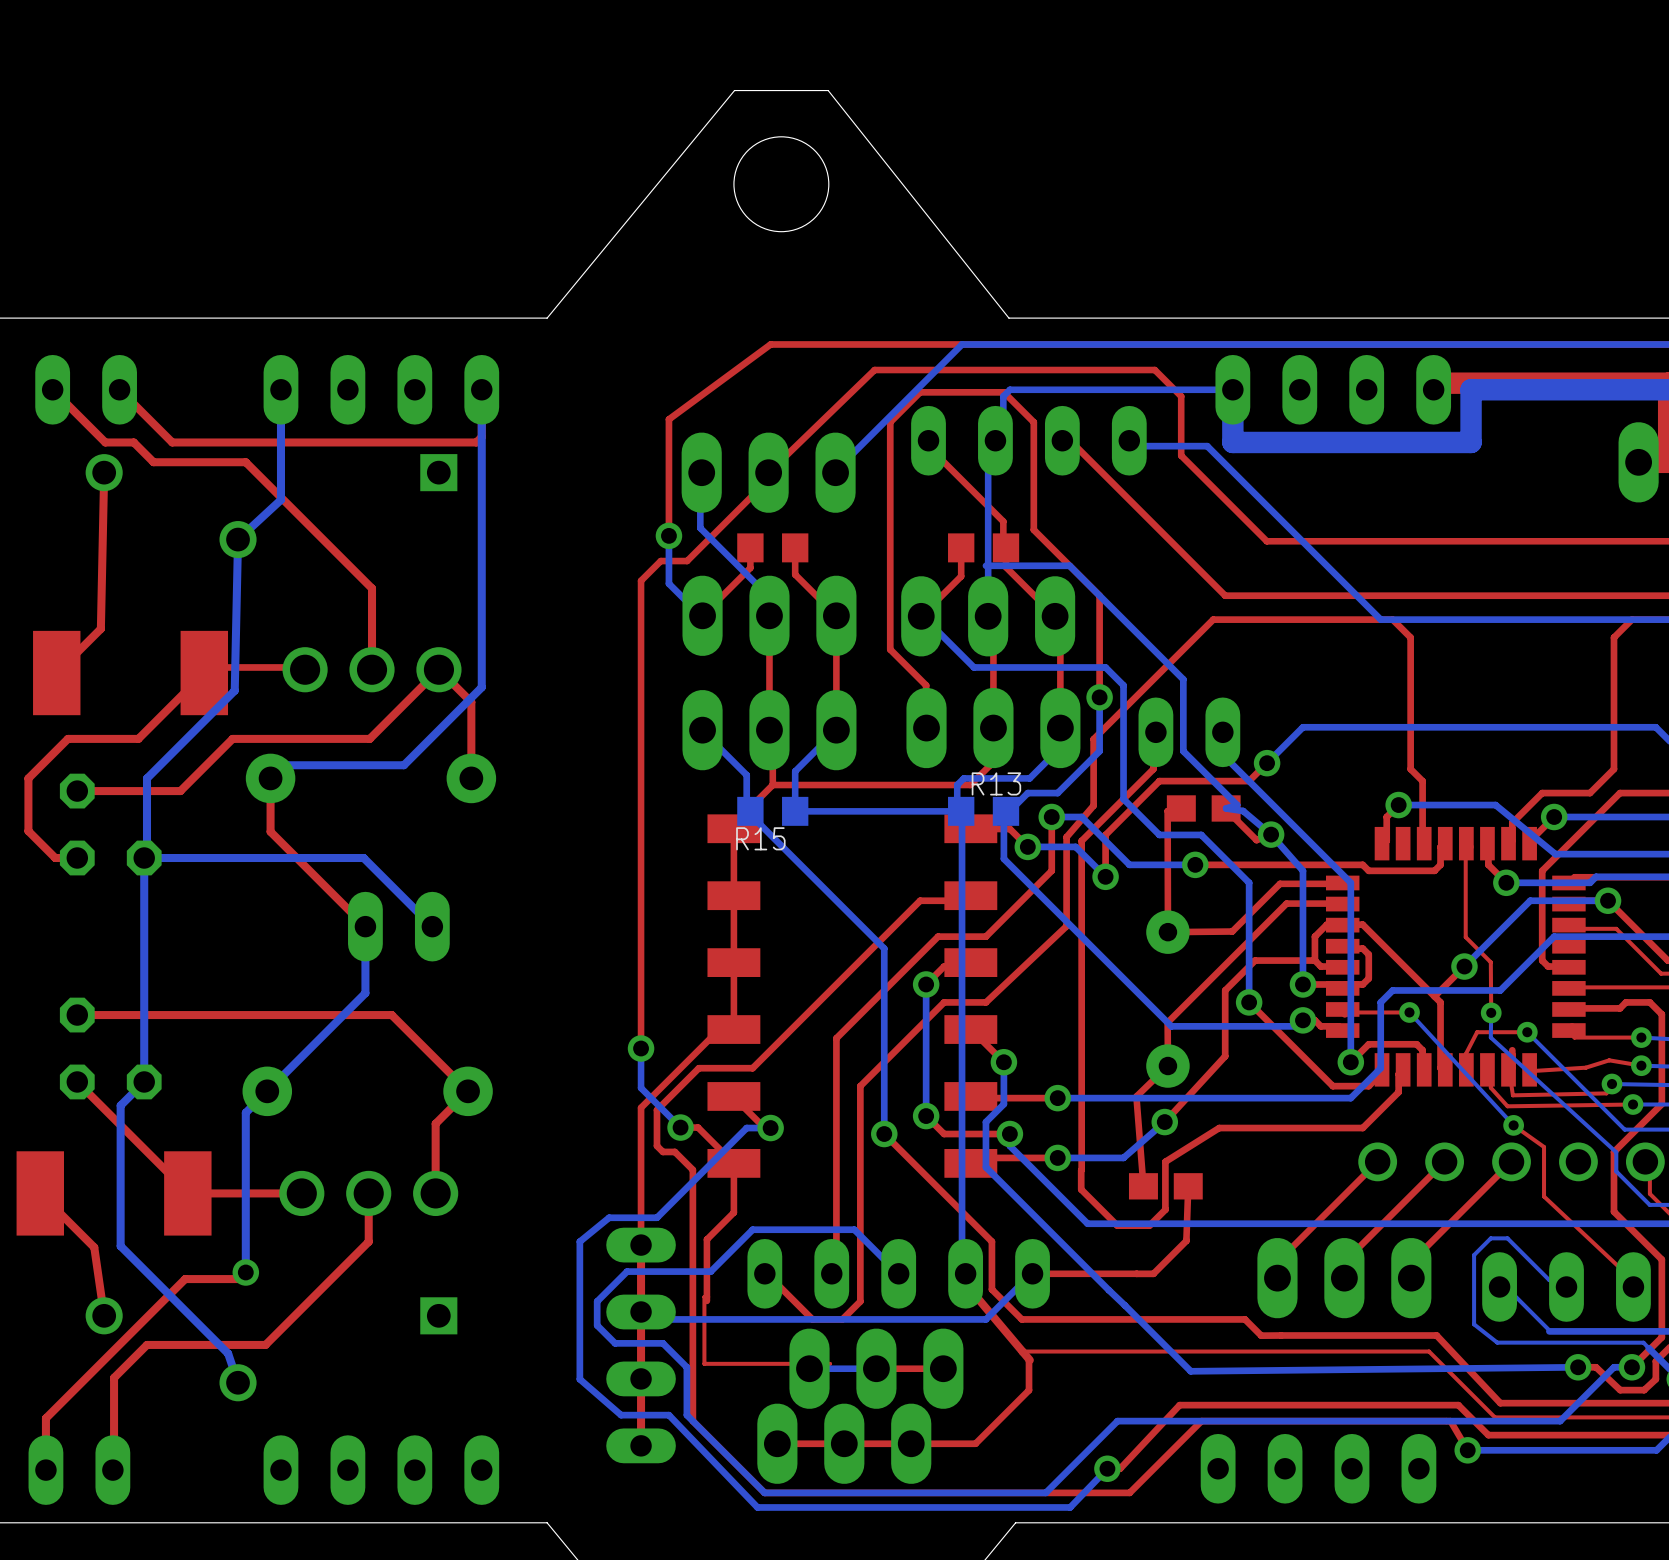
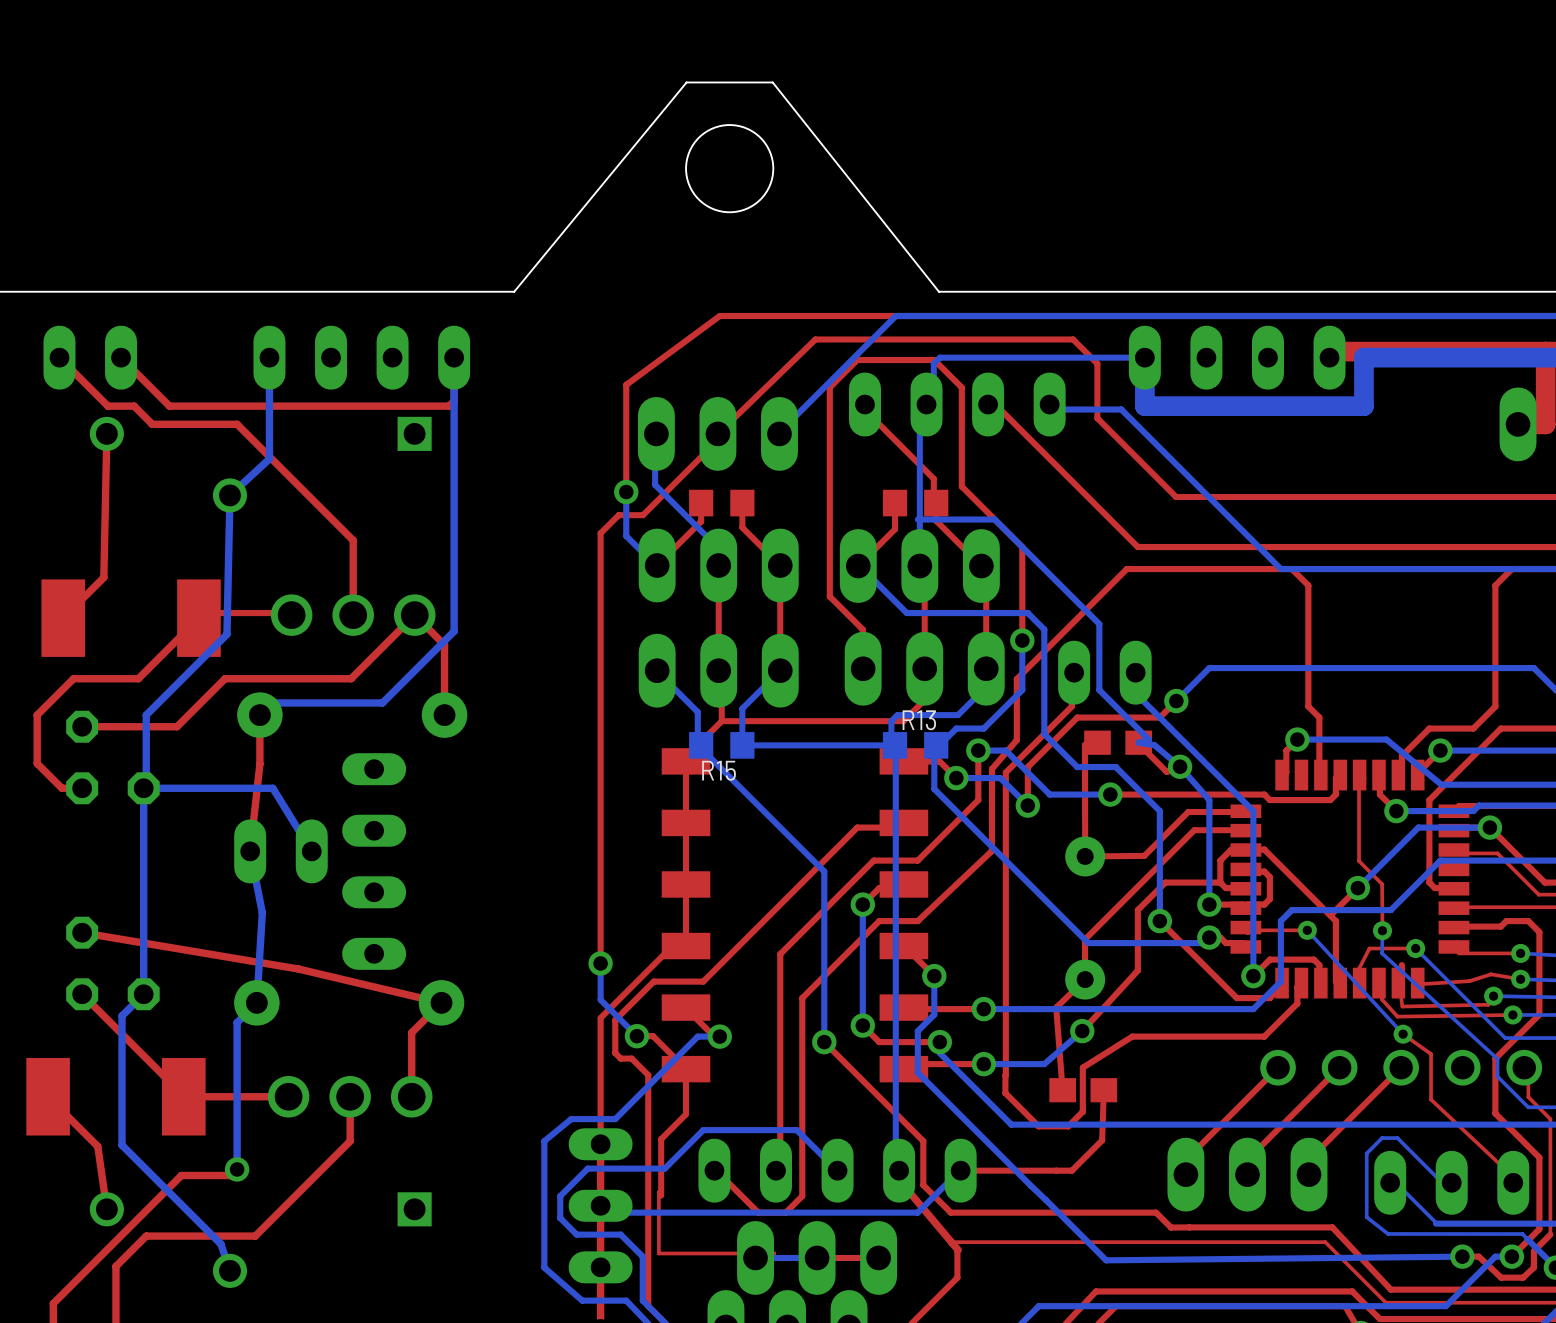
top track: (270, 831) (365, 926) -> (259, 764) (250, 851)
bottom track: (284, 858) (363, 858) (432, 926) -> (272, 788) (311, 851)
part footprint: [348, 891, 450, 962] -> [342, 753, 407, 970]
part: none -> (280, 851)
bottom track: (365, 926) (365, 993) (267, 1091) -> (250, 851) (262, 912) (256, 1002)
top track: (77, 1015) (391, 1015) (468, 1091) -> (82, 932) (298, 969) (441, 1002)

